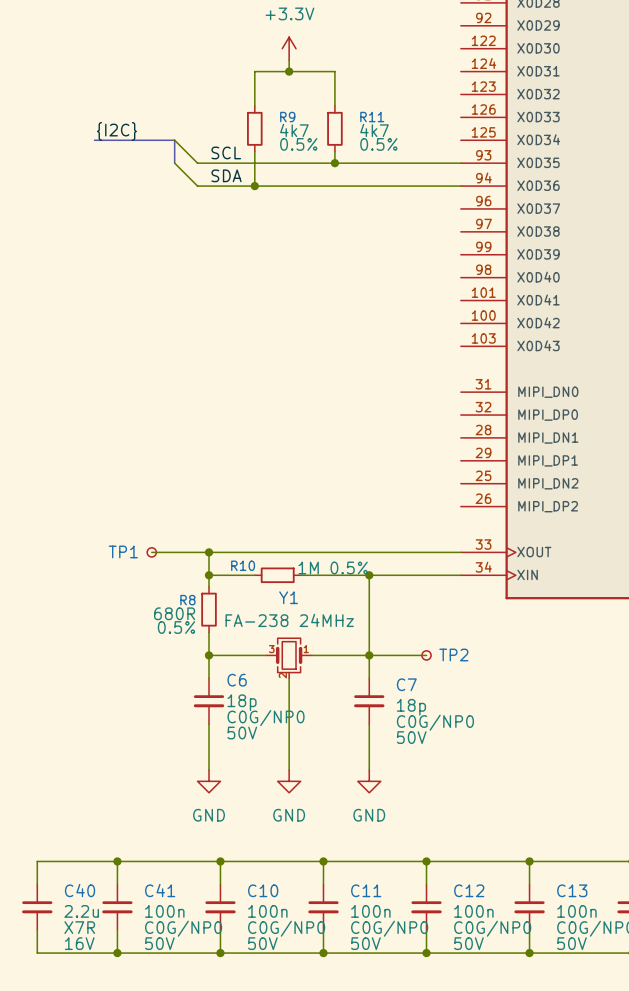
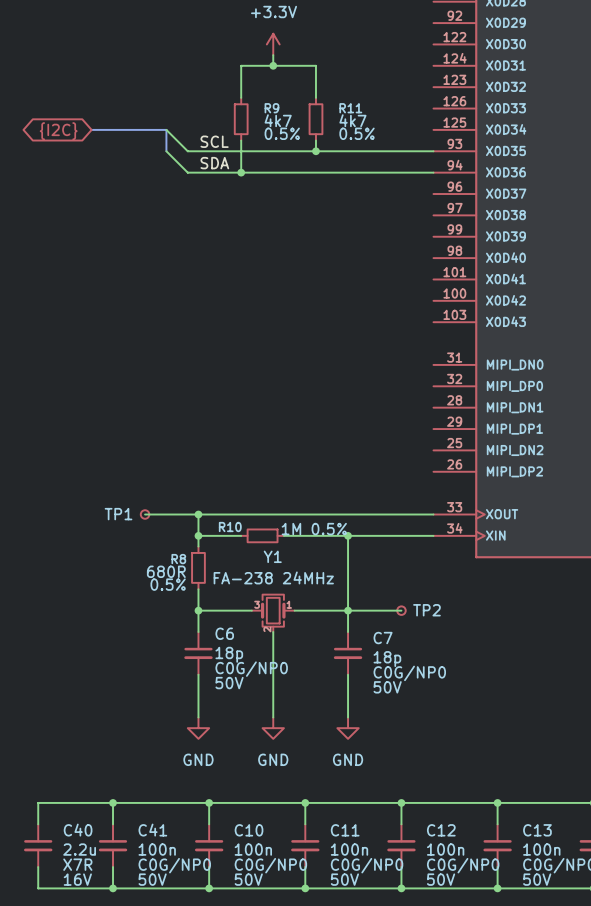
label: {I2C} (116, 131) -> none
global label: none -> {I2C} (58, 131)

